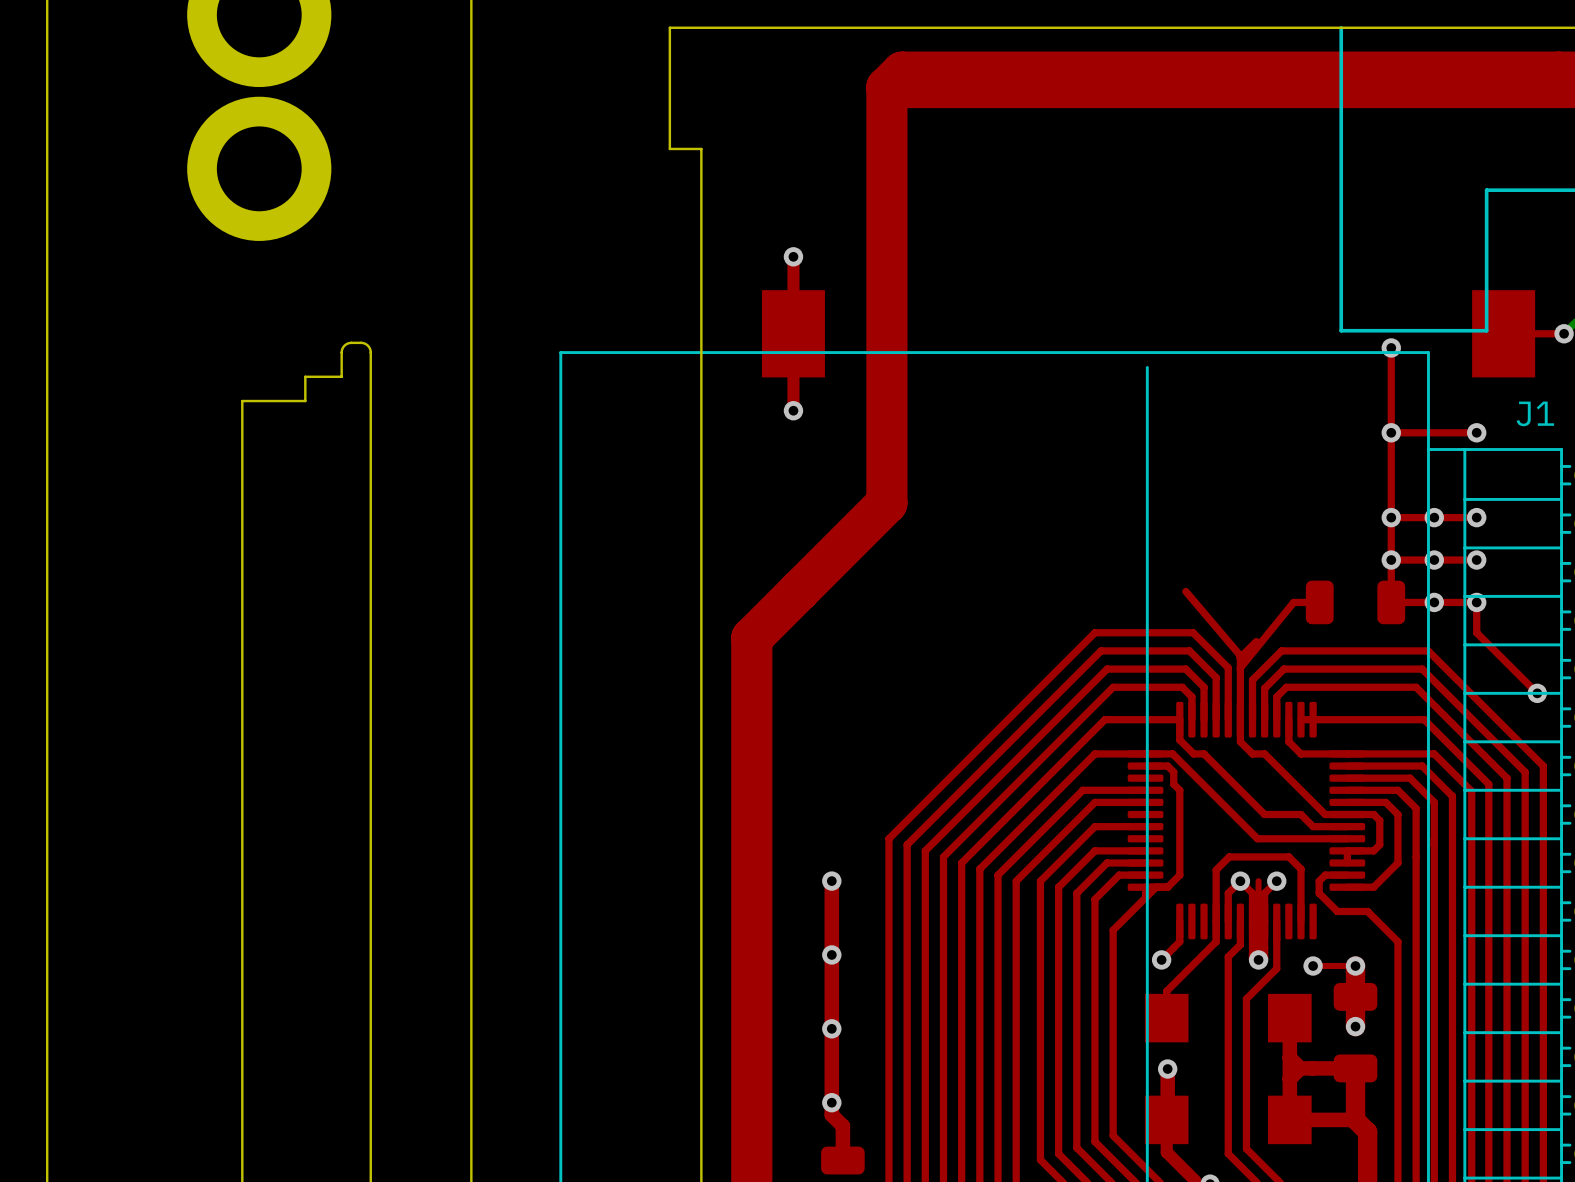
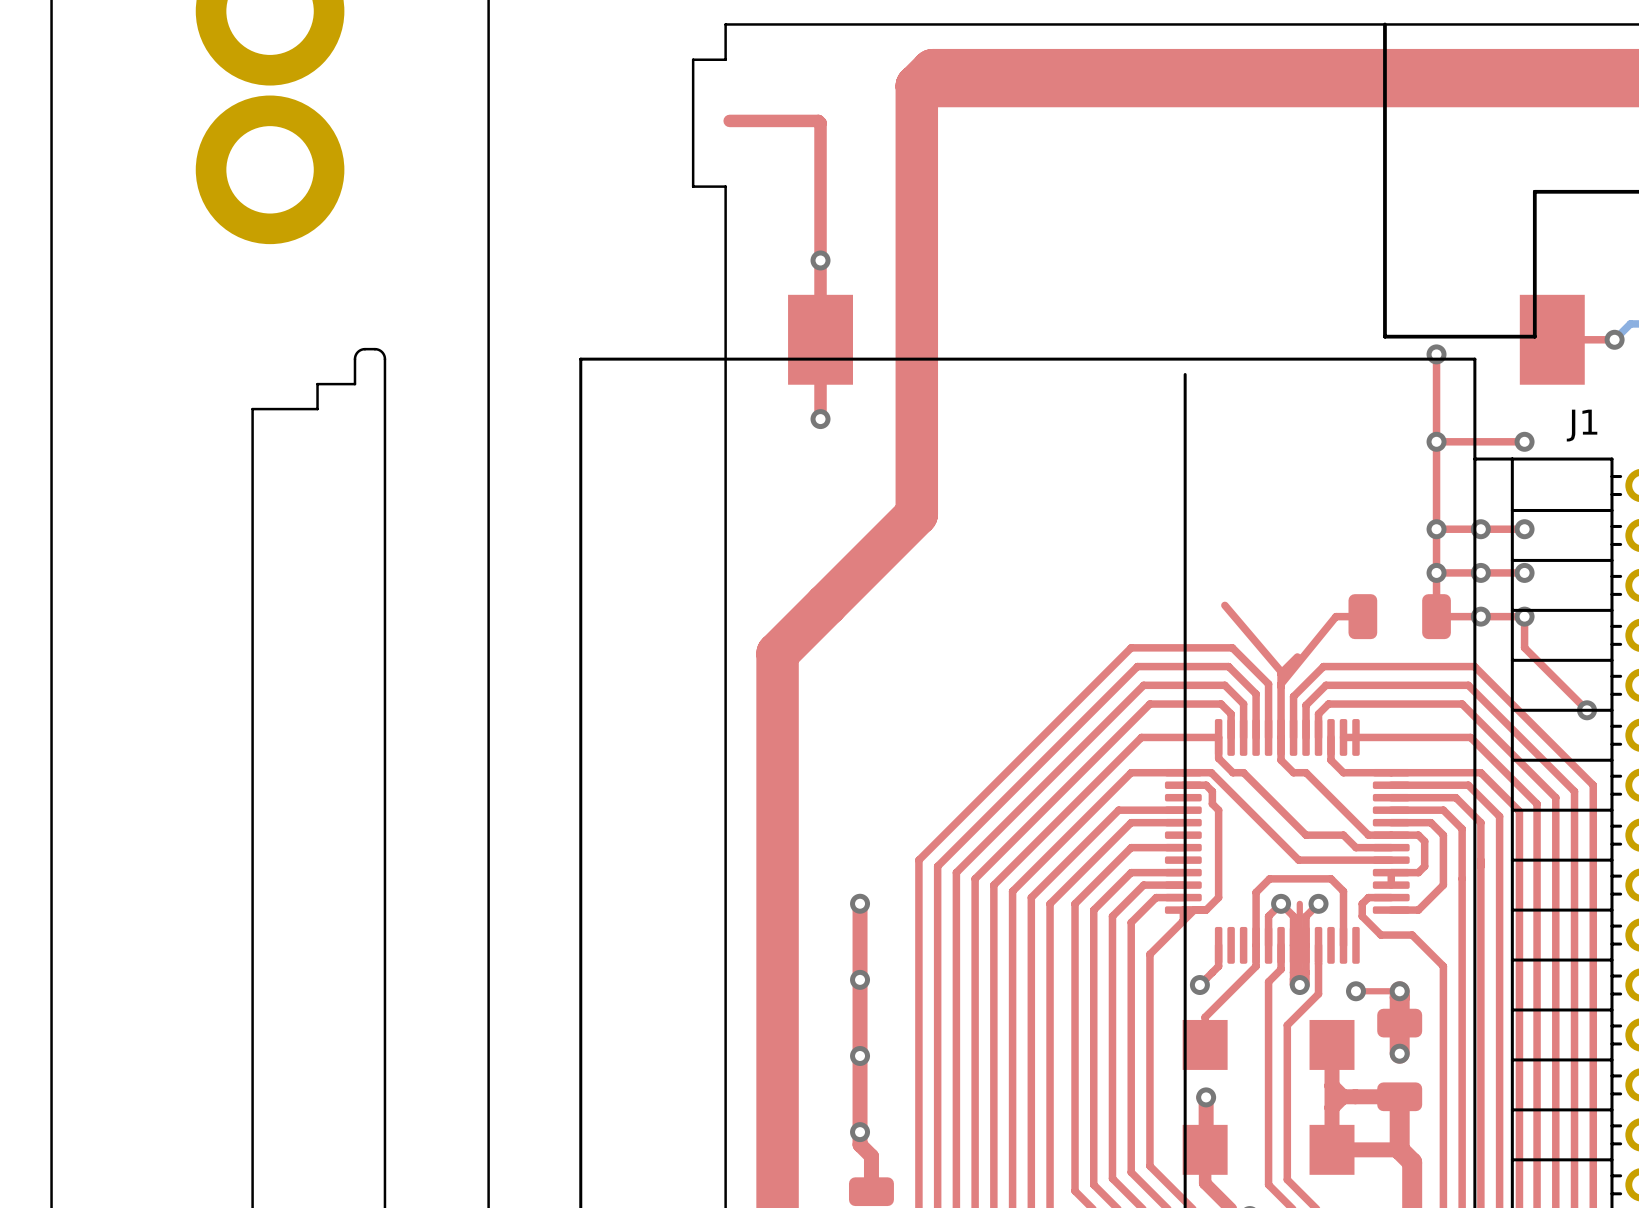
board edge: (701, 27) (669, 27) (669, 62) -> (725, 24) (725, 59) (693, 59)
top track: none -> (729, 120) (818, 120) (820, 122) (820, 260)
board edge: (669, 148) (701, 148) (701, 185) -> (693, 149) (693, 186) (725, 186)

